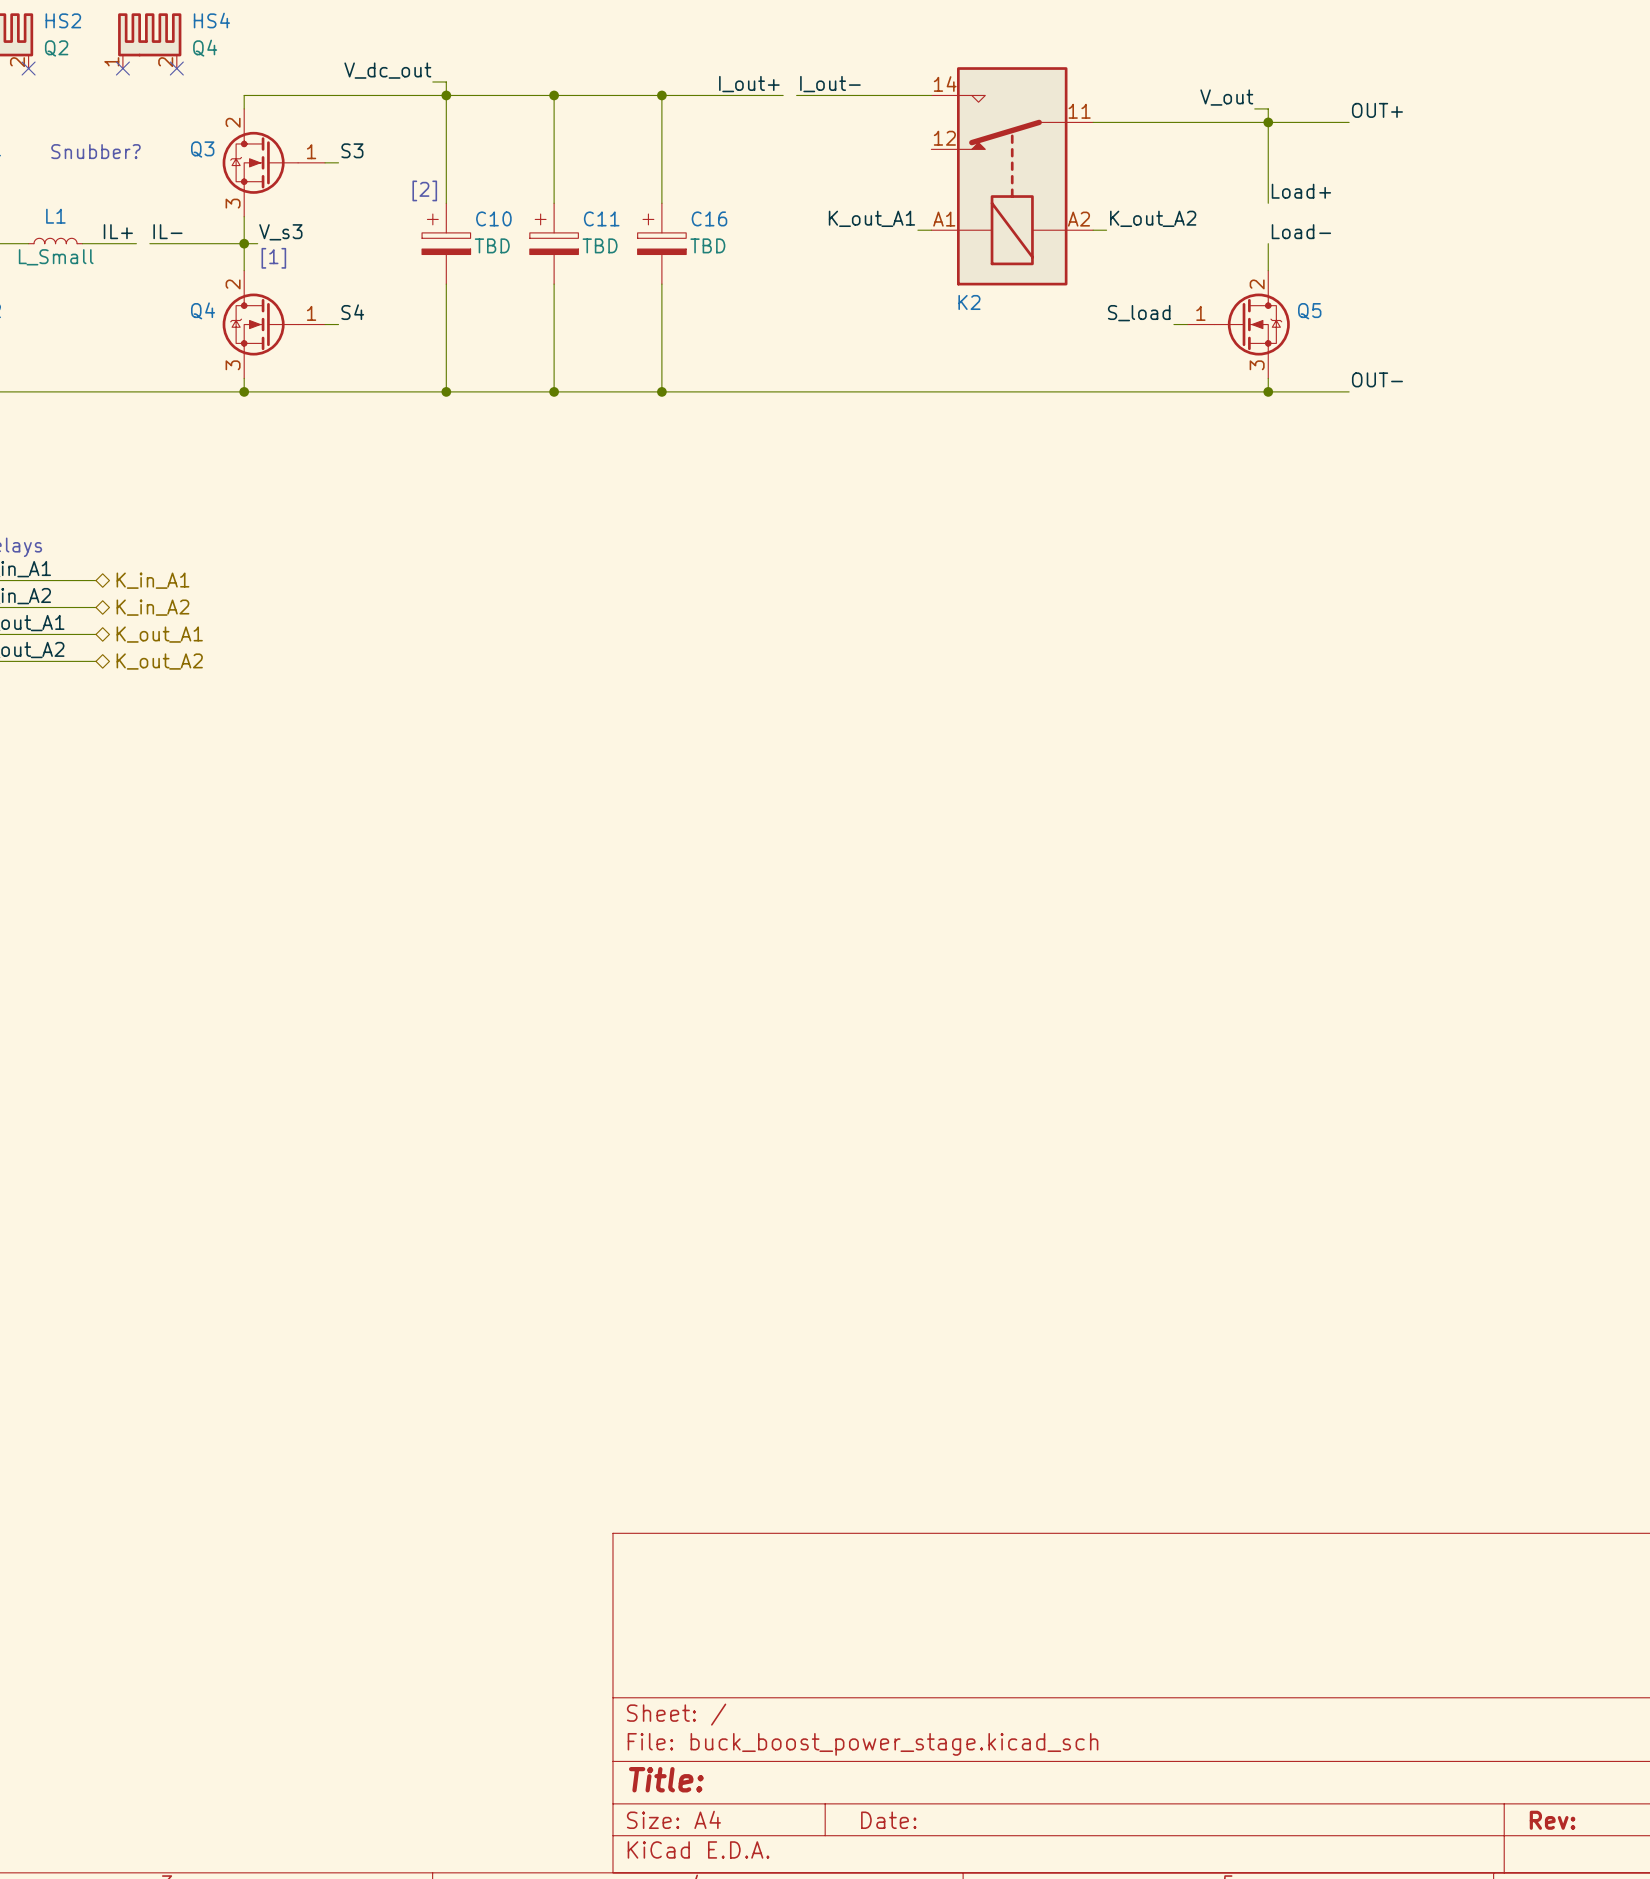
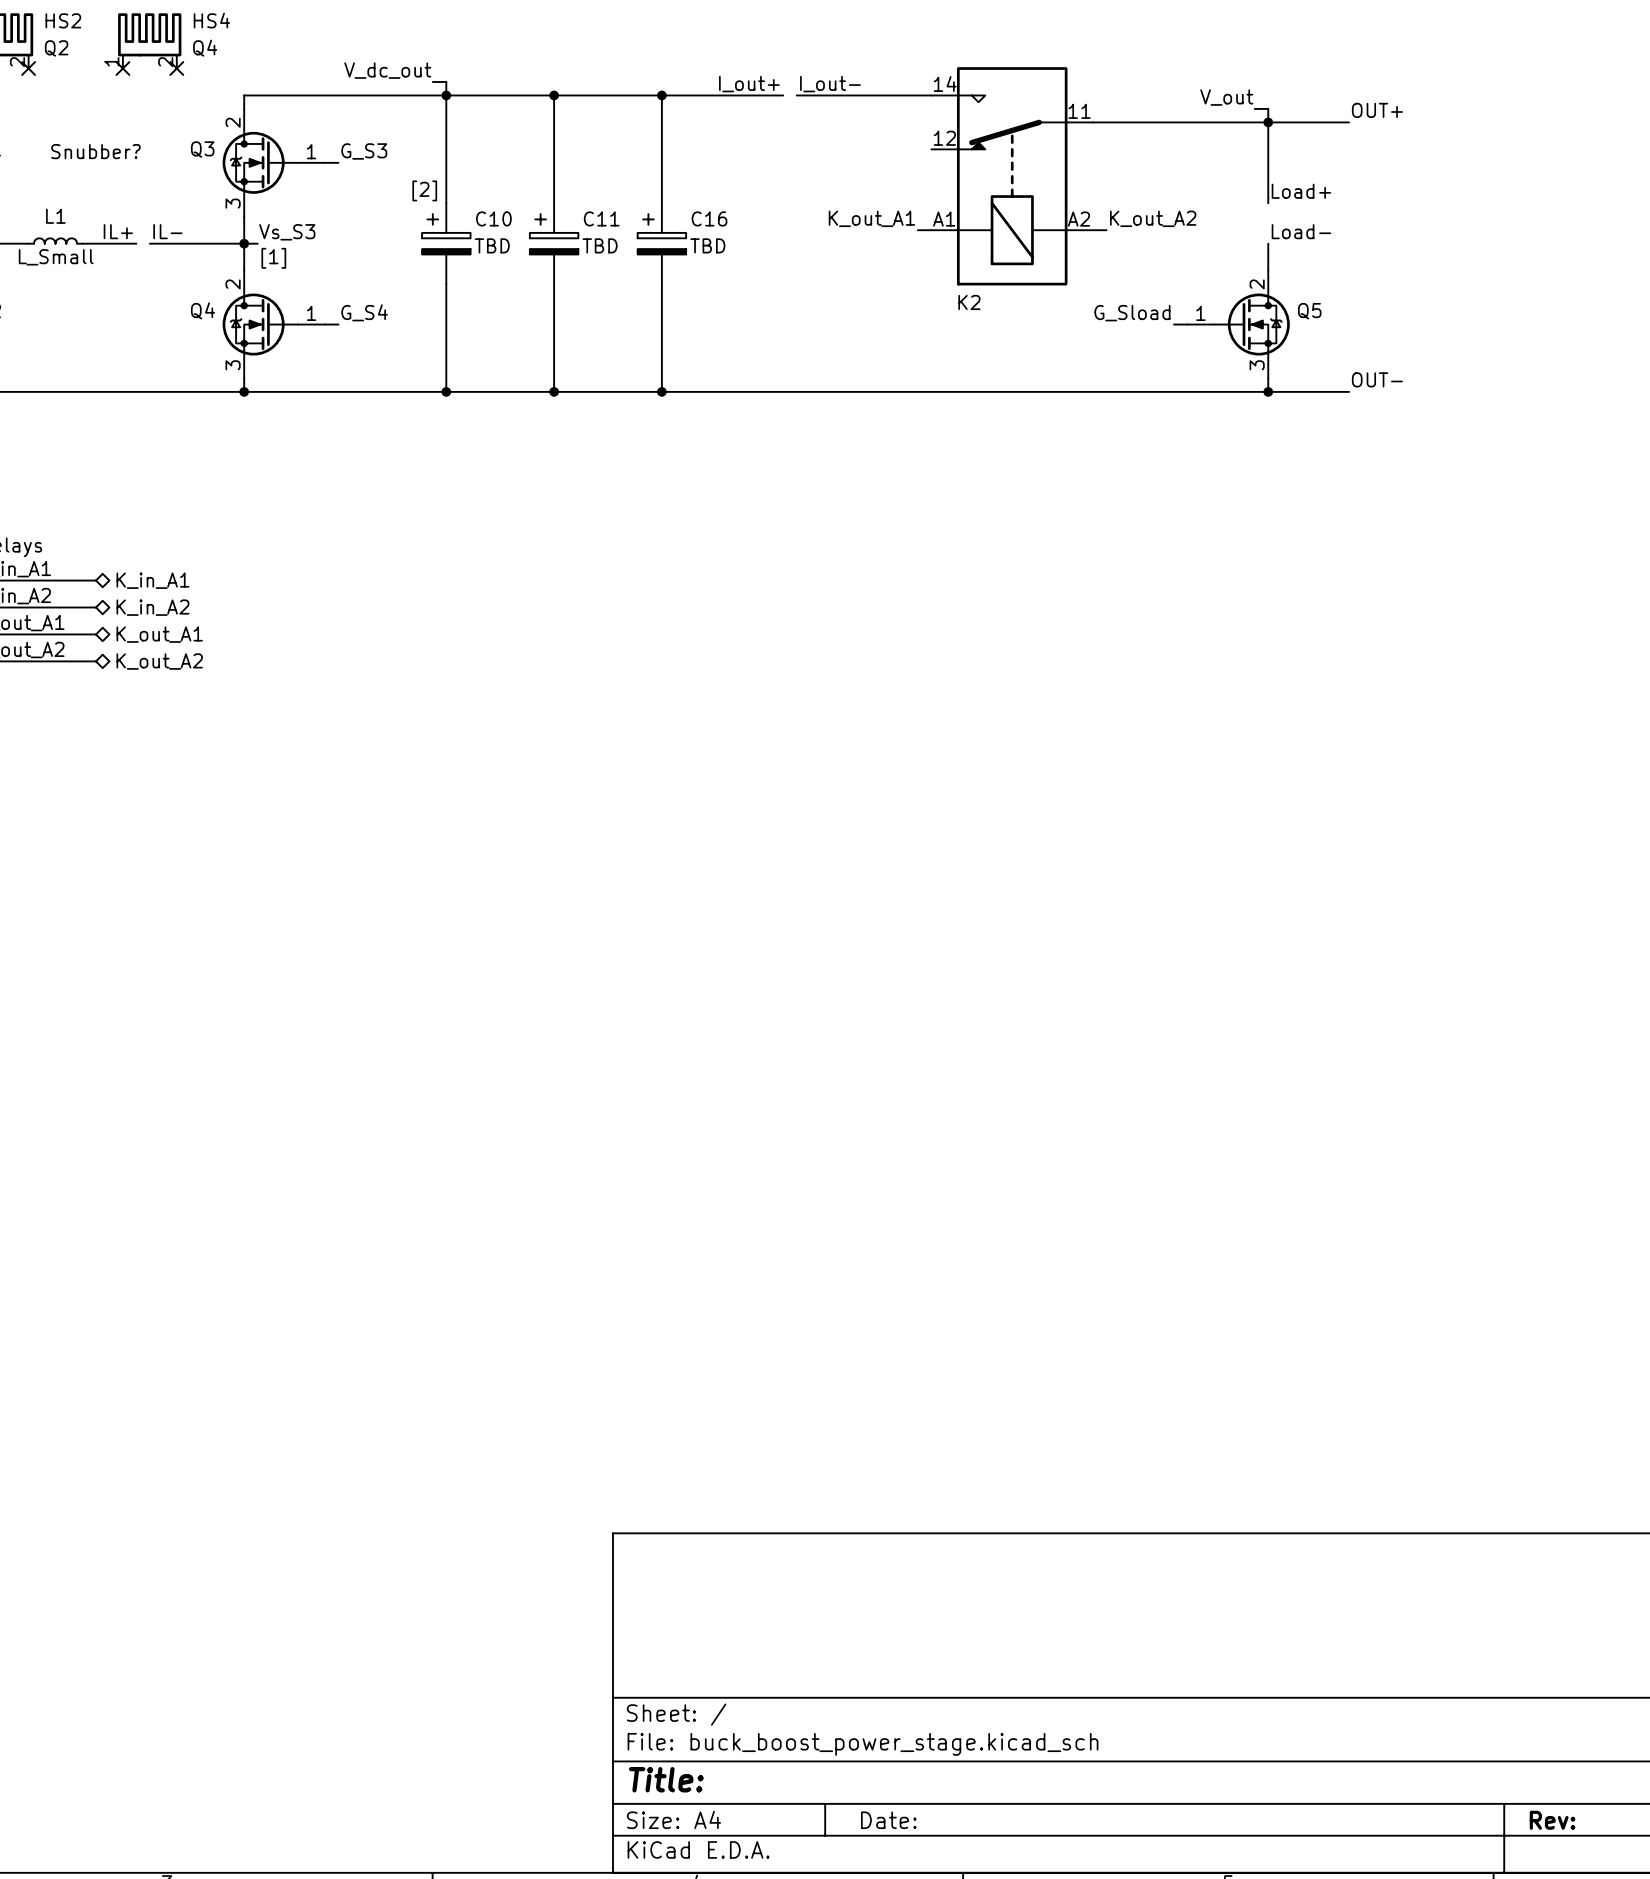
label: S3 (352, 150) -> G_S3 (364, 151)
label: V_s3 (280, 232) -> Vs_S3 (287, 232)
label: S4 (352, 312) -> G_S4 (364, 312)
label: S_load (1139, 313) -> G_Sload (1132, 313)

